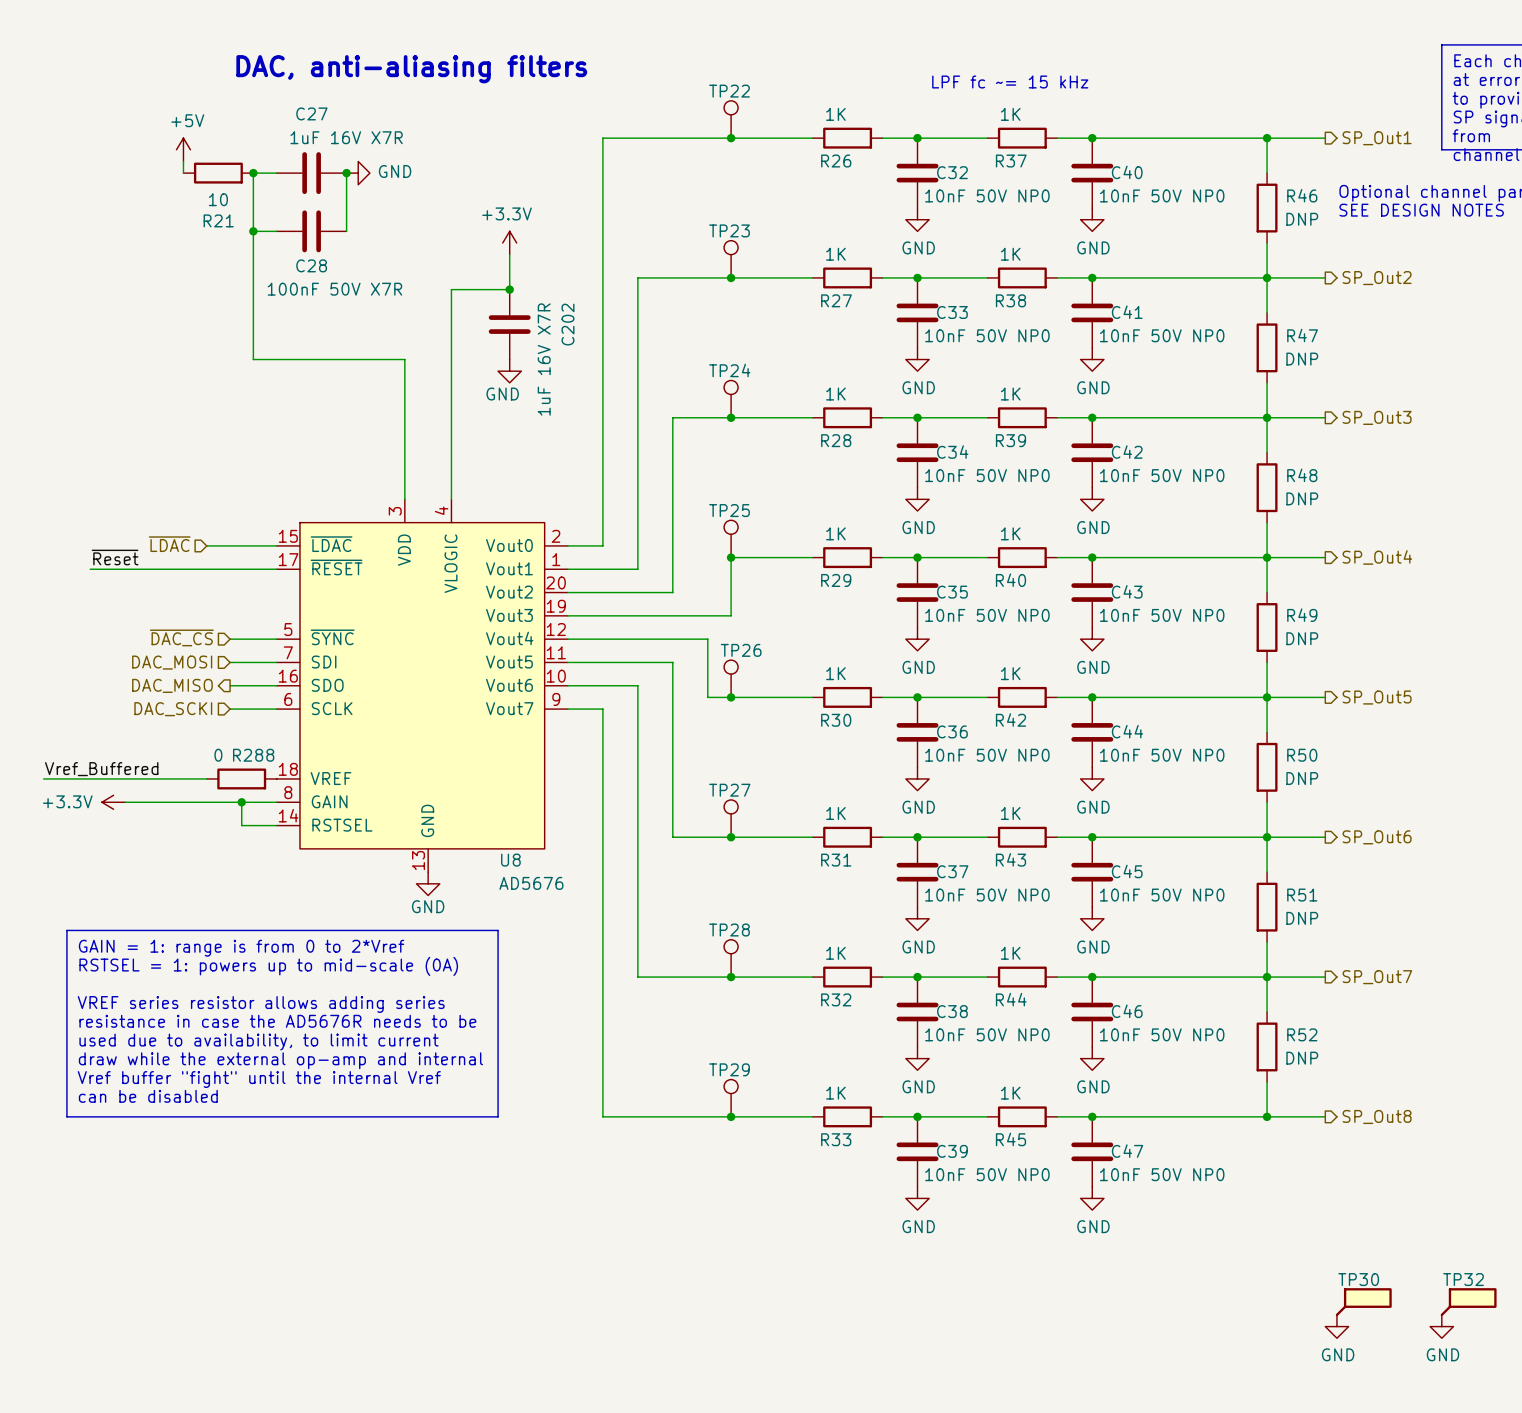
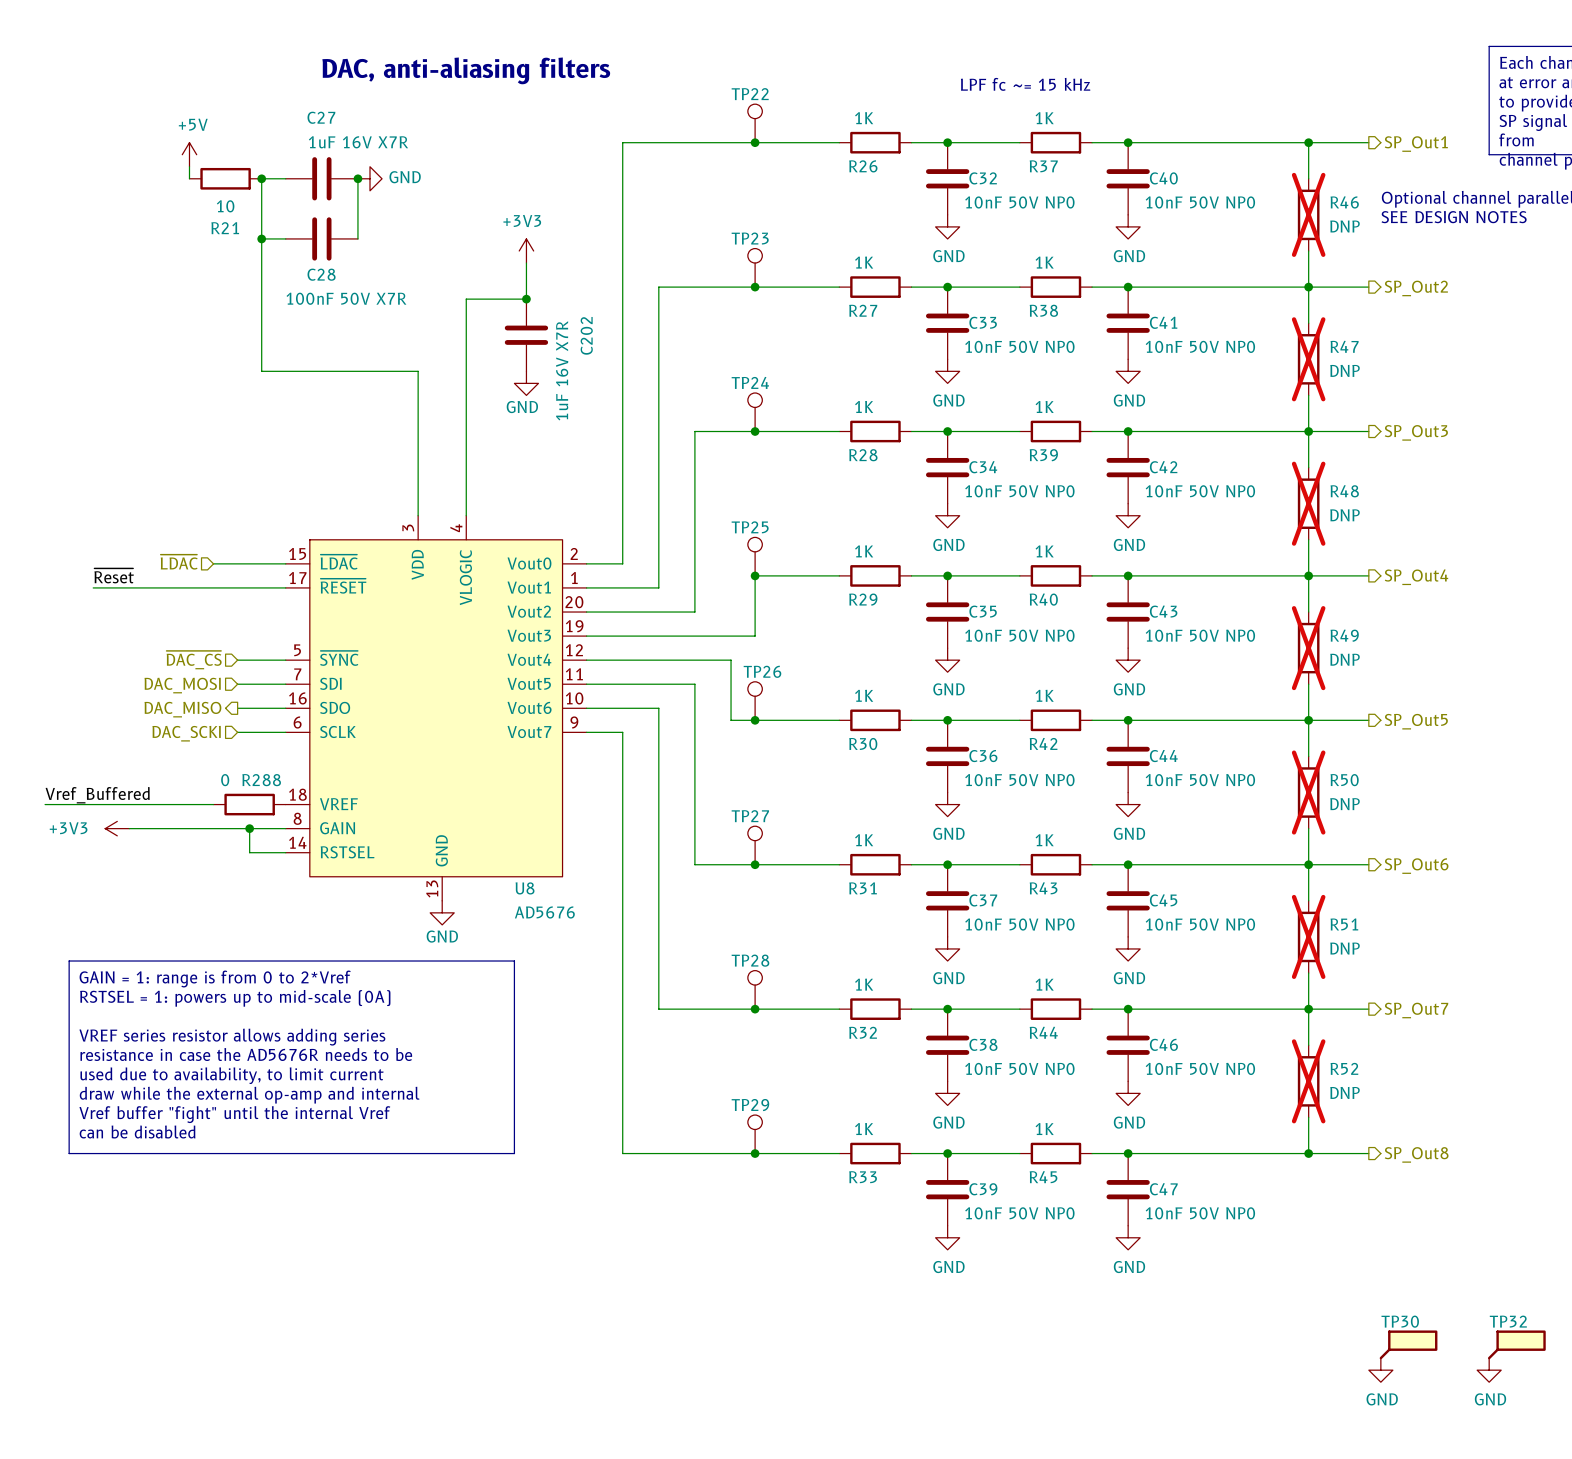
R46 do-not-place cross: none -> (1308, 214)
power symbol: +3.3V (509, 243) -> +3V3 (526, 250)
R47 do-not-place cross: none -> (1308, 359)
R48 do-not-place cross: none -> (1308, 503)
R49 do-not-place cross: none -> (1308, 648)
R50 do-not-place cross: none -> (1308, 792)
power symbol: +3.3V (113, 802) -> +3V3 (117, 828)
R51 do-not-place cross: none -> (1308, 936)
R52 do-not-place cross: none -> (1308, 1081)

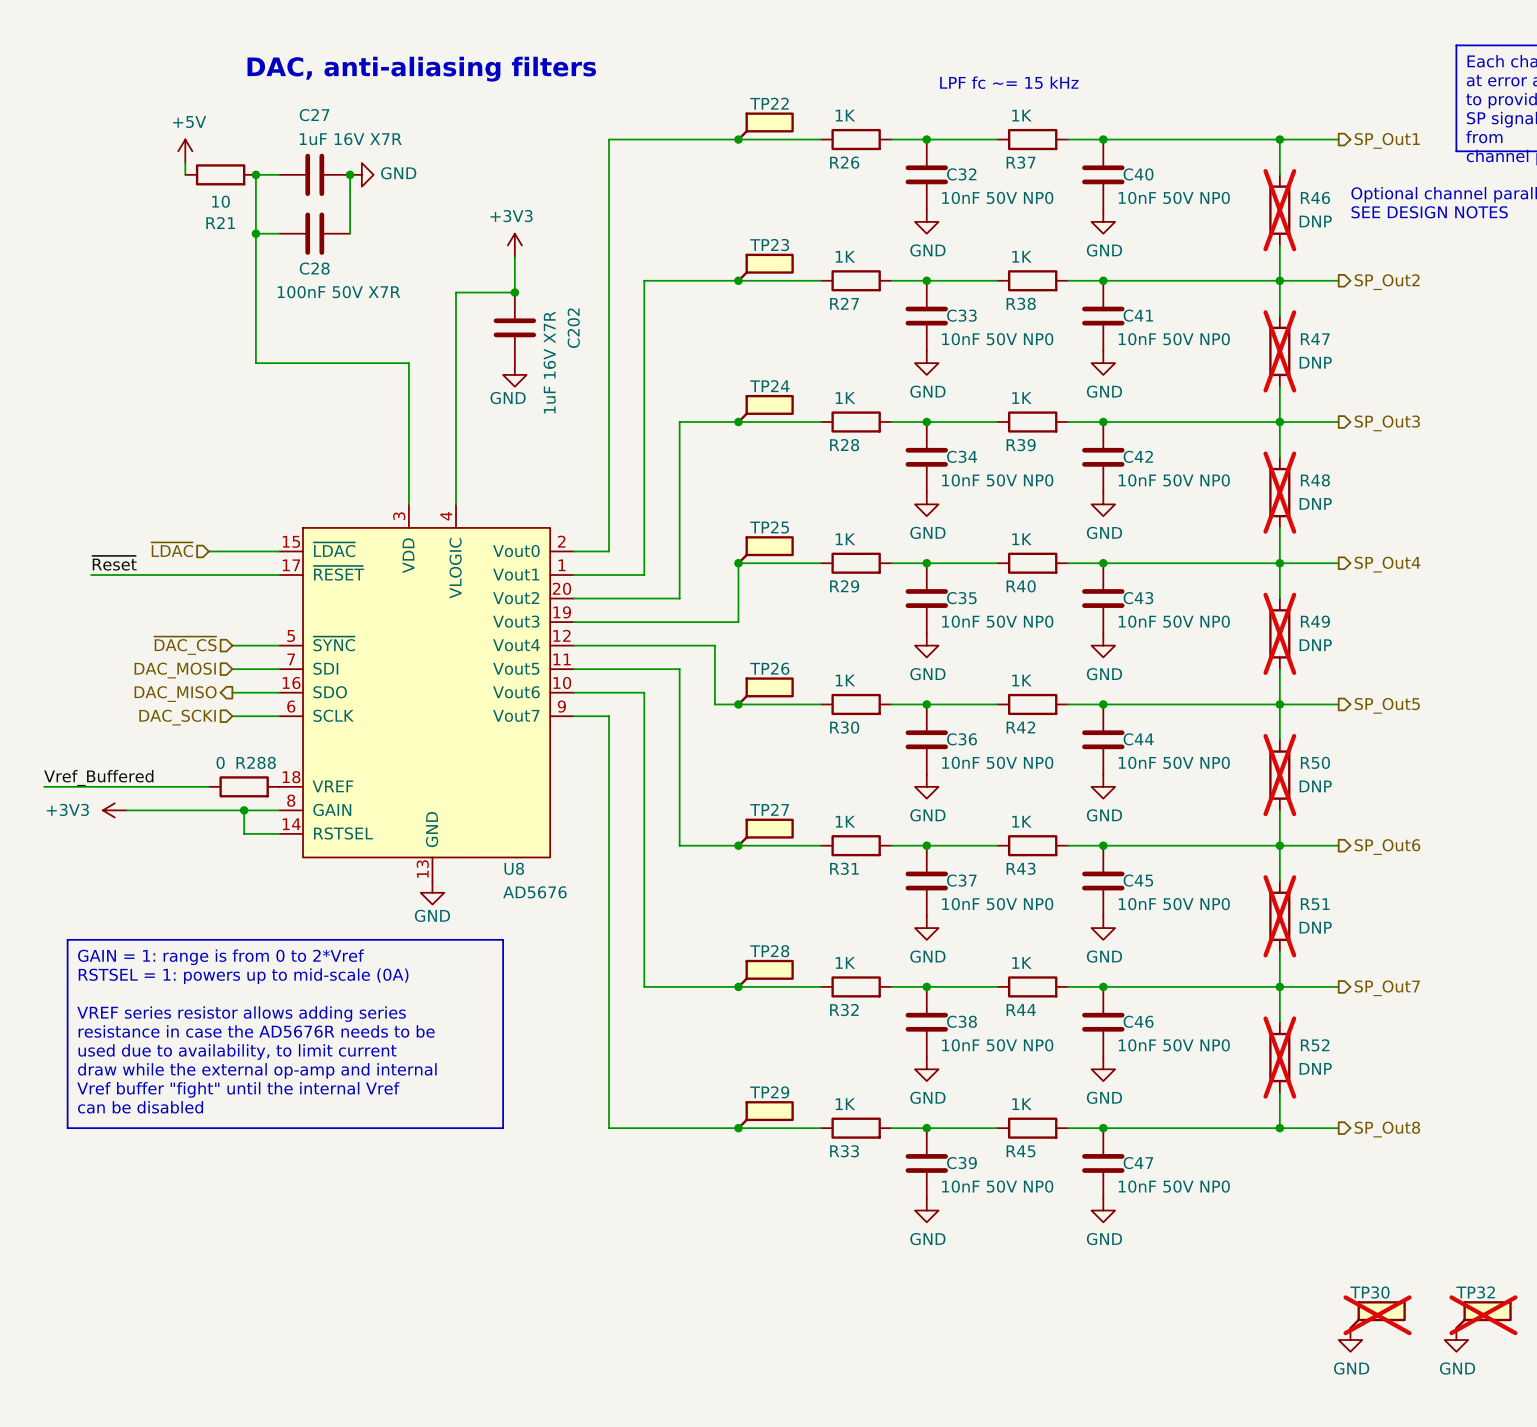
TP22 symbol: [747, 104, 763, 143] -> [737, 112, 794, 141]
TP23 symbol: [747, 248, 763, 288] -> [737, 253, 794, 282]
TP24 symbol: [747, 392, 763, 432] -> [737, 394, 794, 424]
TP25 symbol: [747, 537, 763, 576] -> [737, 536, 794, 565]
TP26 symbol: [747, 681, 763, 721] -> [737, 677, 794, 706]
TP27 symbol: [747, 826, 763, 865] -> [737, 818, 794, 847]
TP28 symbol: [747, 970, 763, 1010] -> [737, 959, 794, 989]
TP29 symbol: [747, 1115, 763, 1154] -> [737, 1101, 794, 1130]
TP30 do-not-place cross: none -> (1377, 1315)
TP32 do-not-place cross: none -> (1483, 1315)

